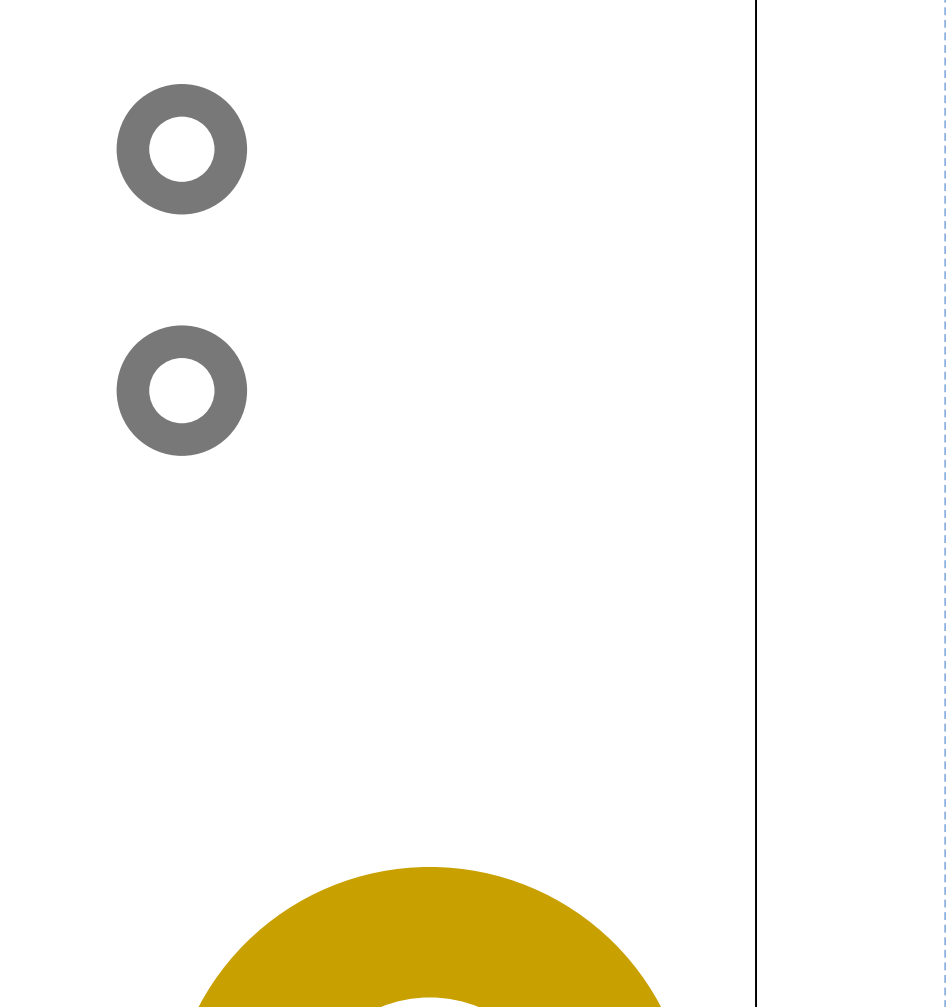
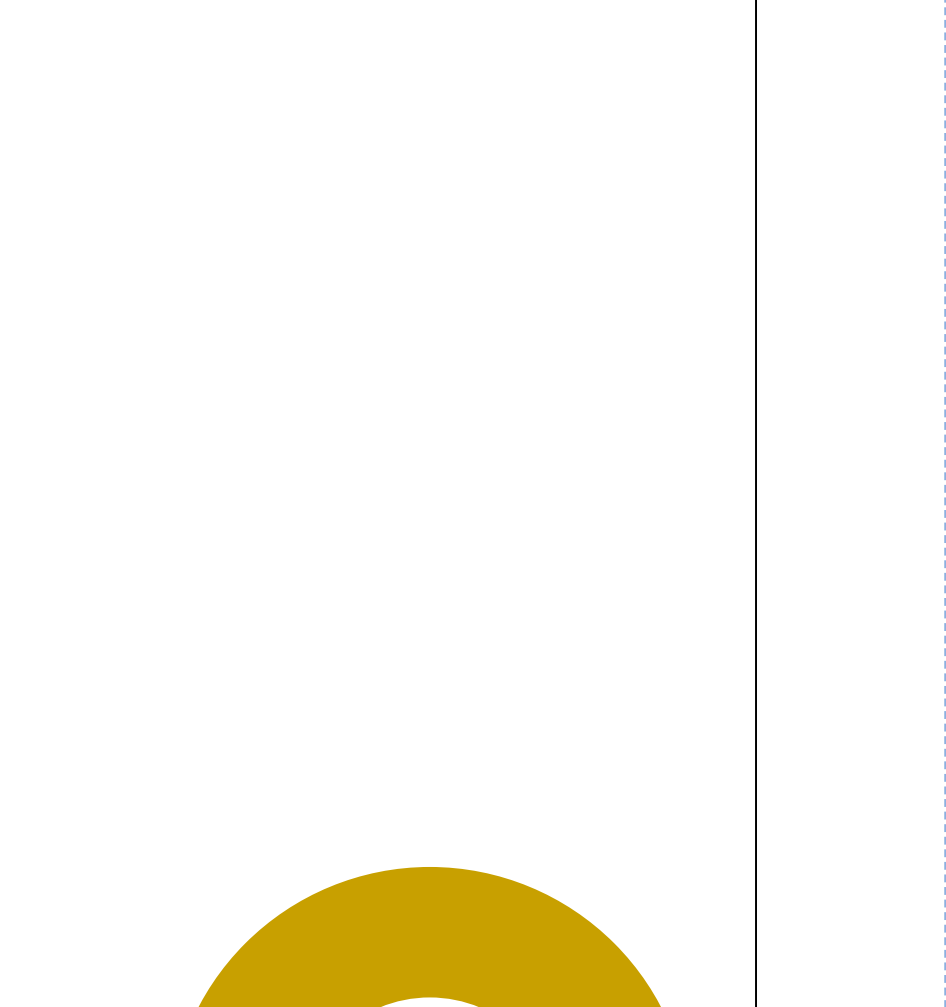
via: (181, 149) -> none
via: (181, 390) -> none

